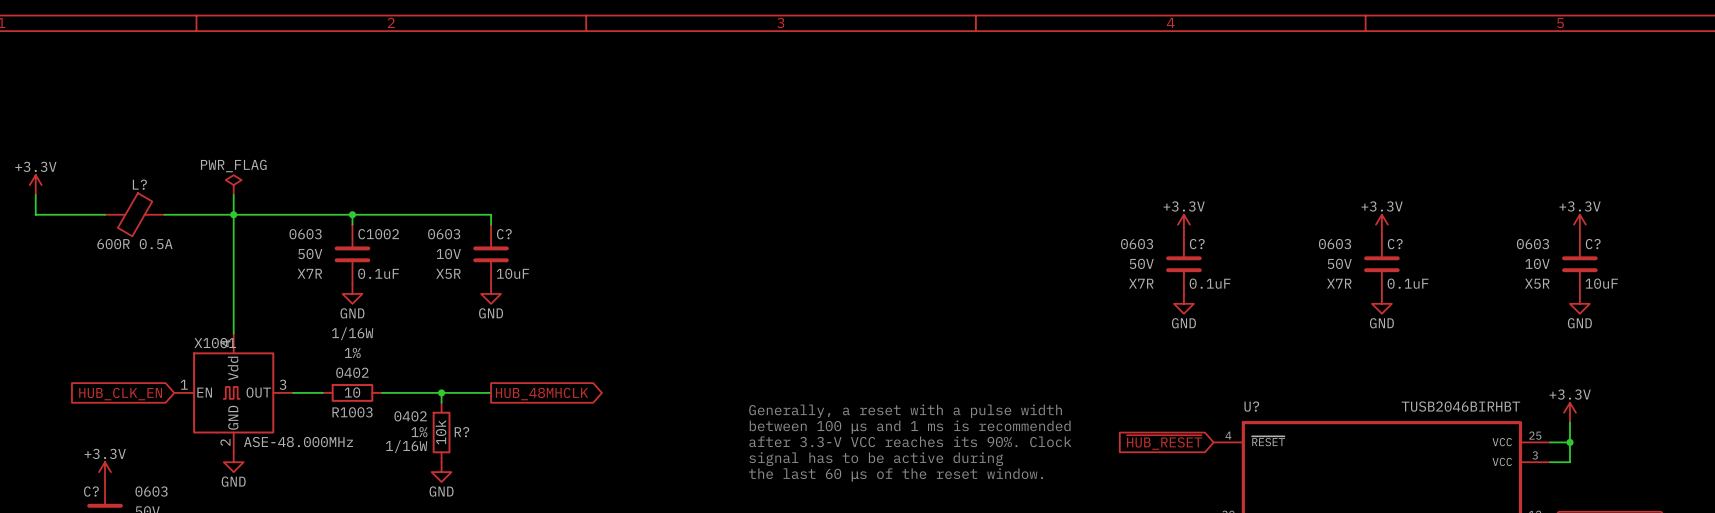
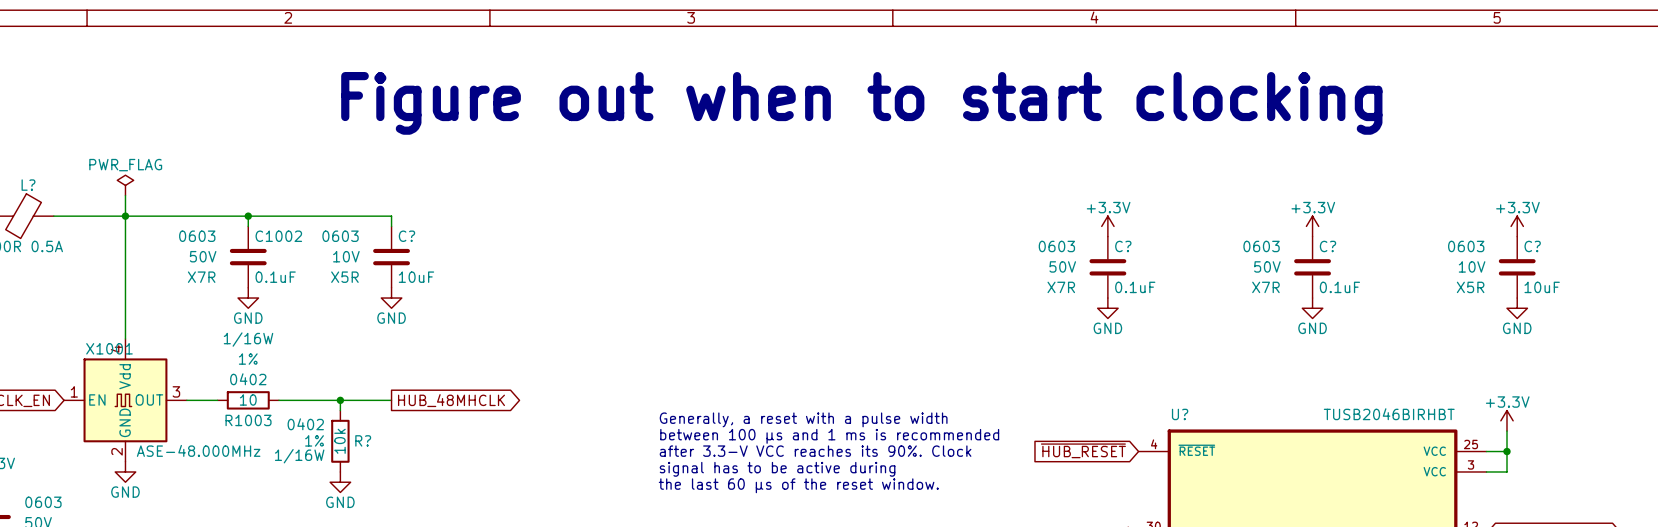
text: none -> Figure out when to start clocking (861, 103)

